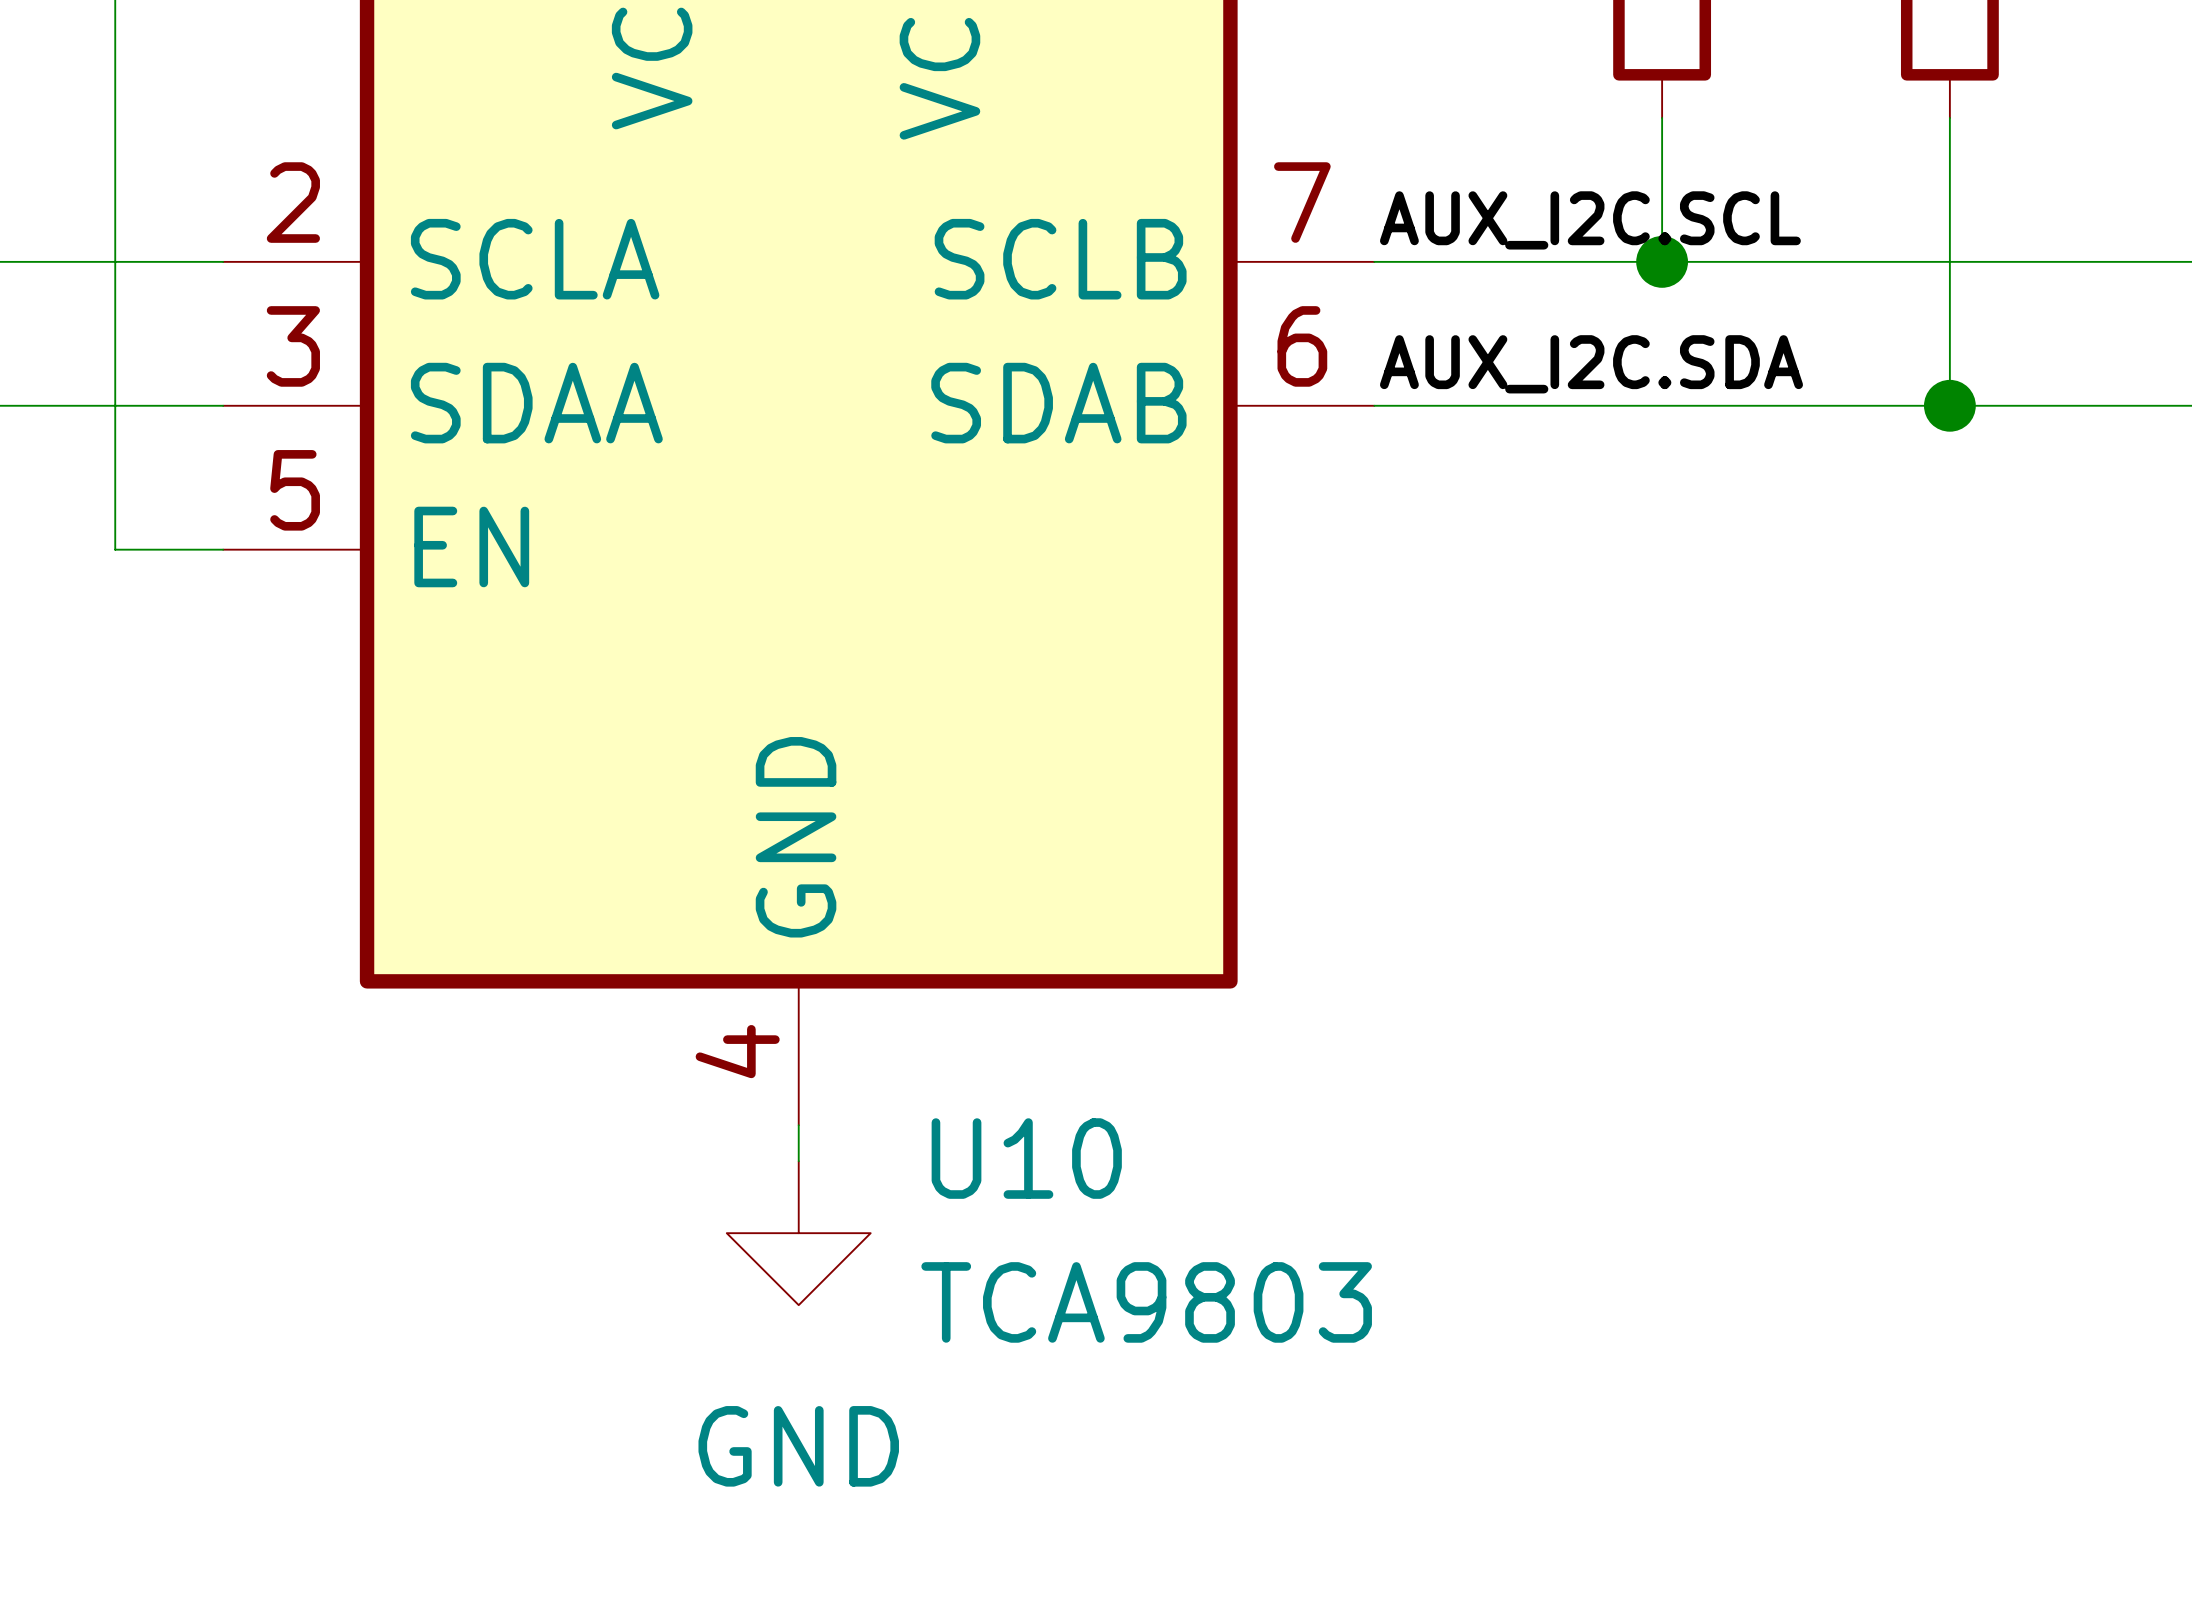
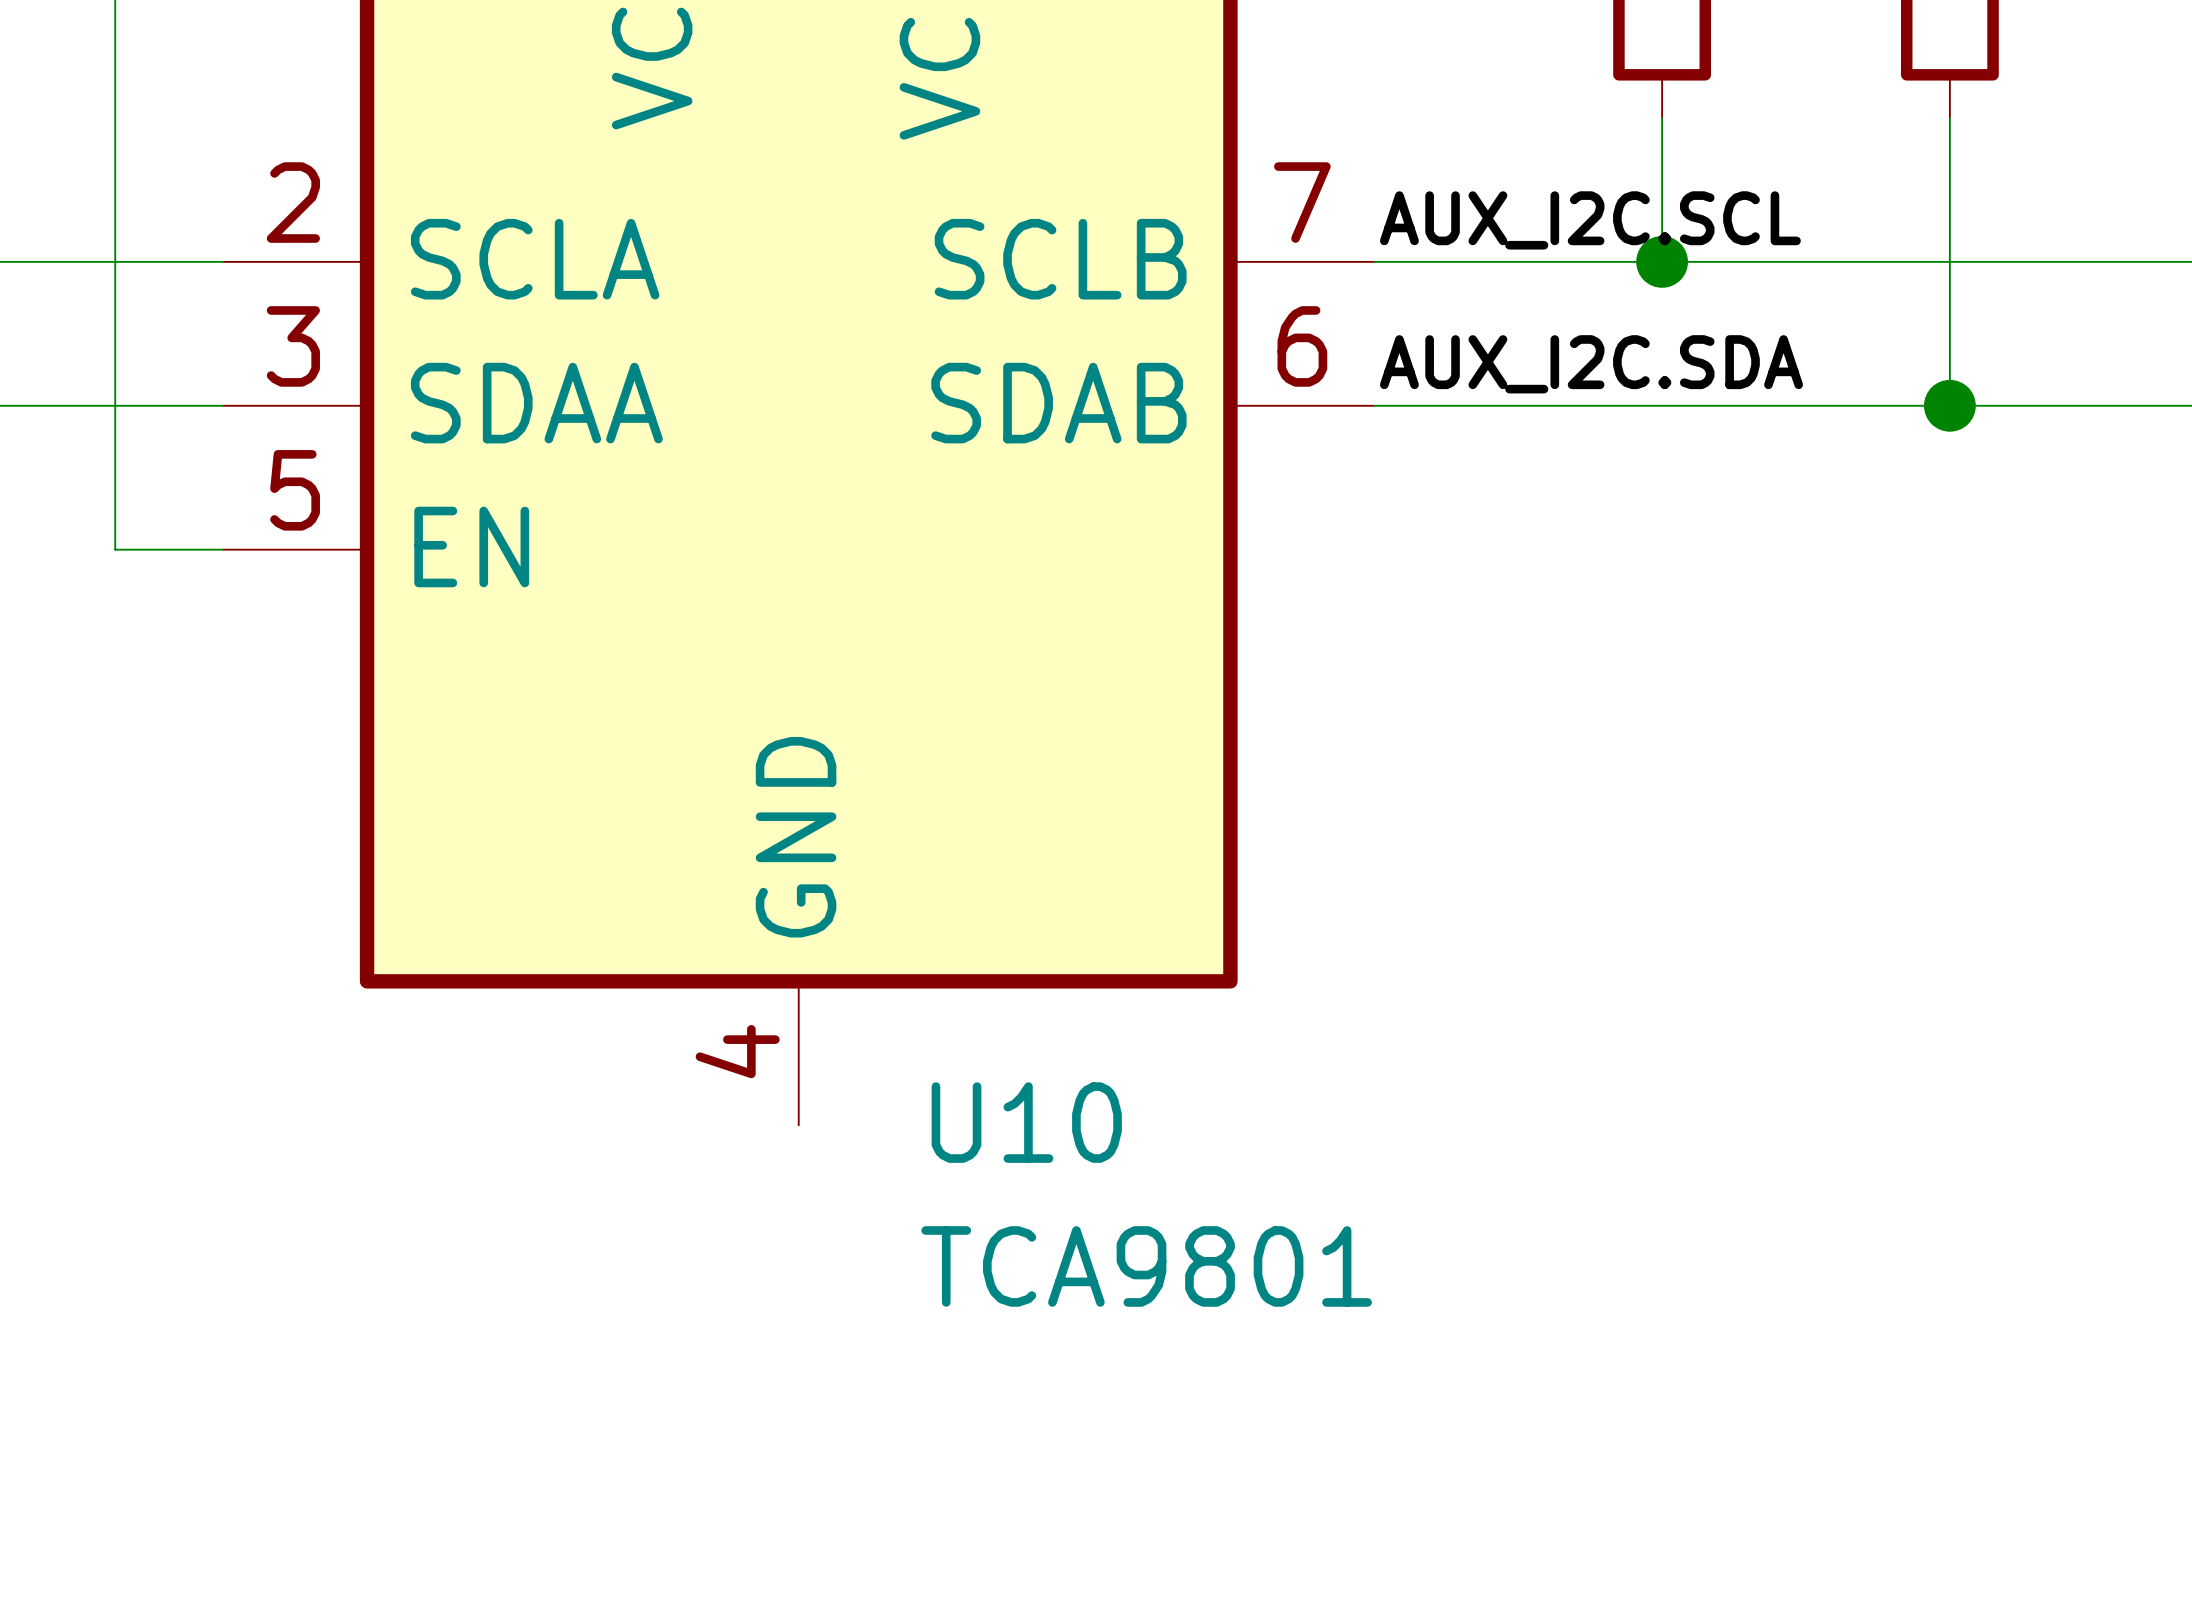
wire: (798, 1125) (798, 1161) -> none
U10 name position: U10 (1026, 1158) -> U10 (1026, 1122)
power symbol: GND (798, 1233) -> none
U10 value: TCA9803 (1146, 1302) -> TCA9801 (1146, 1266)

